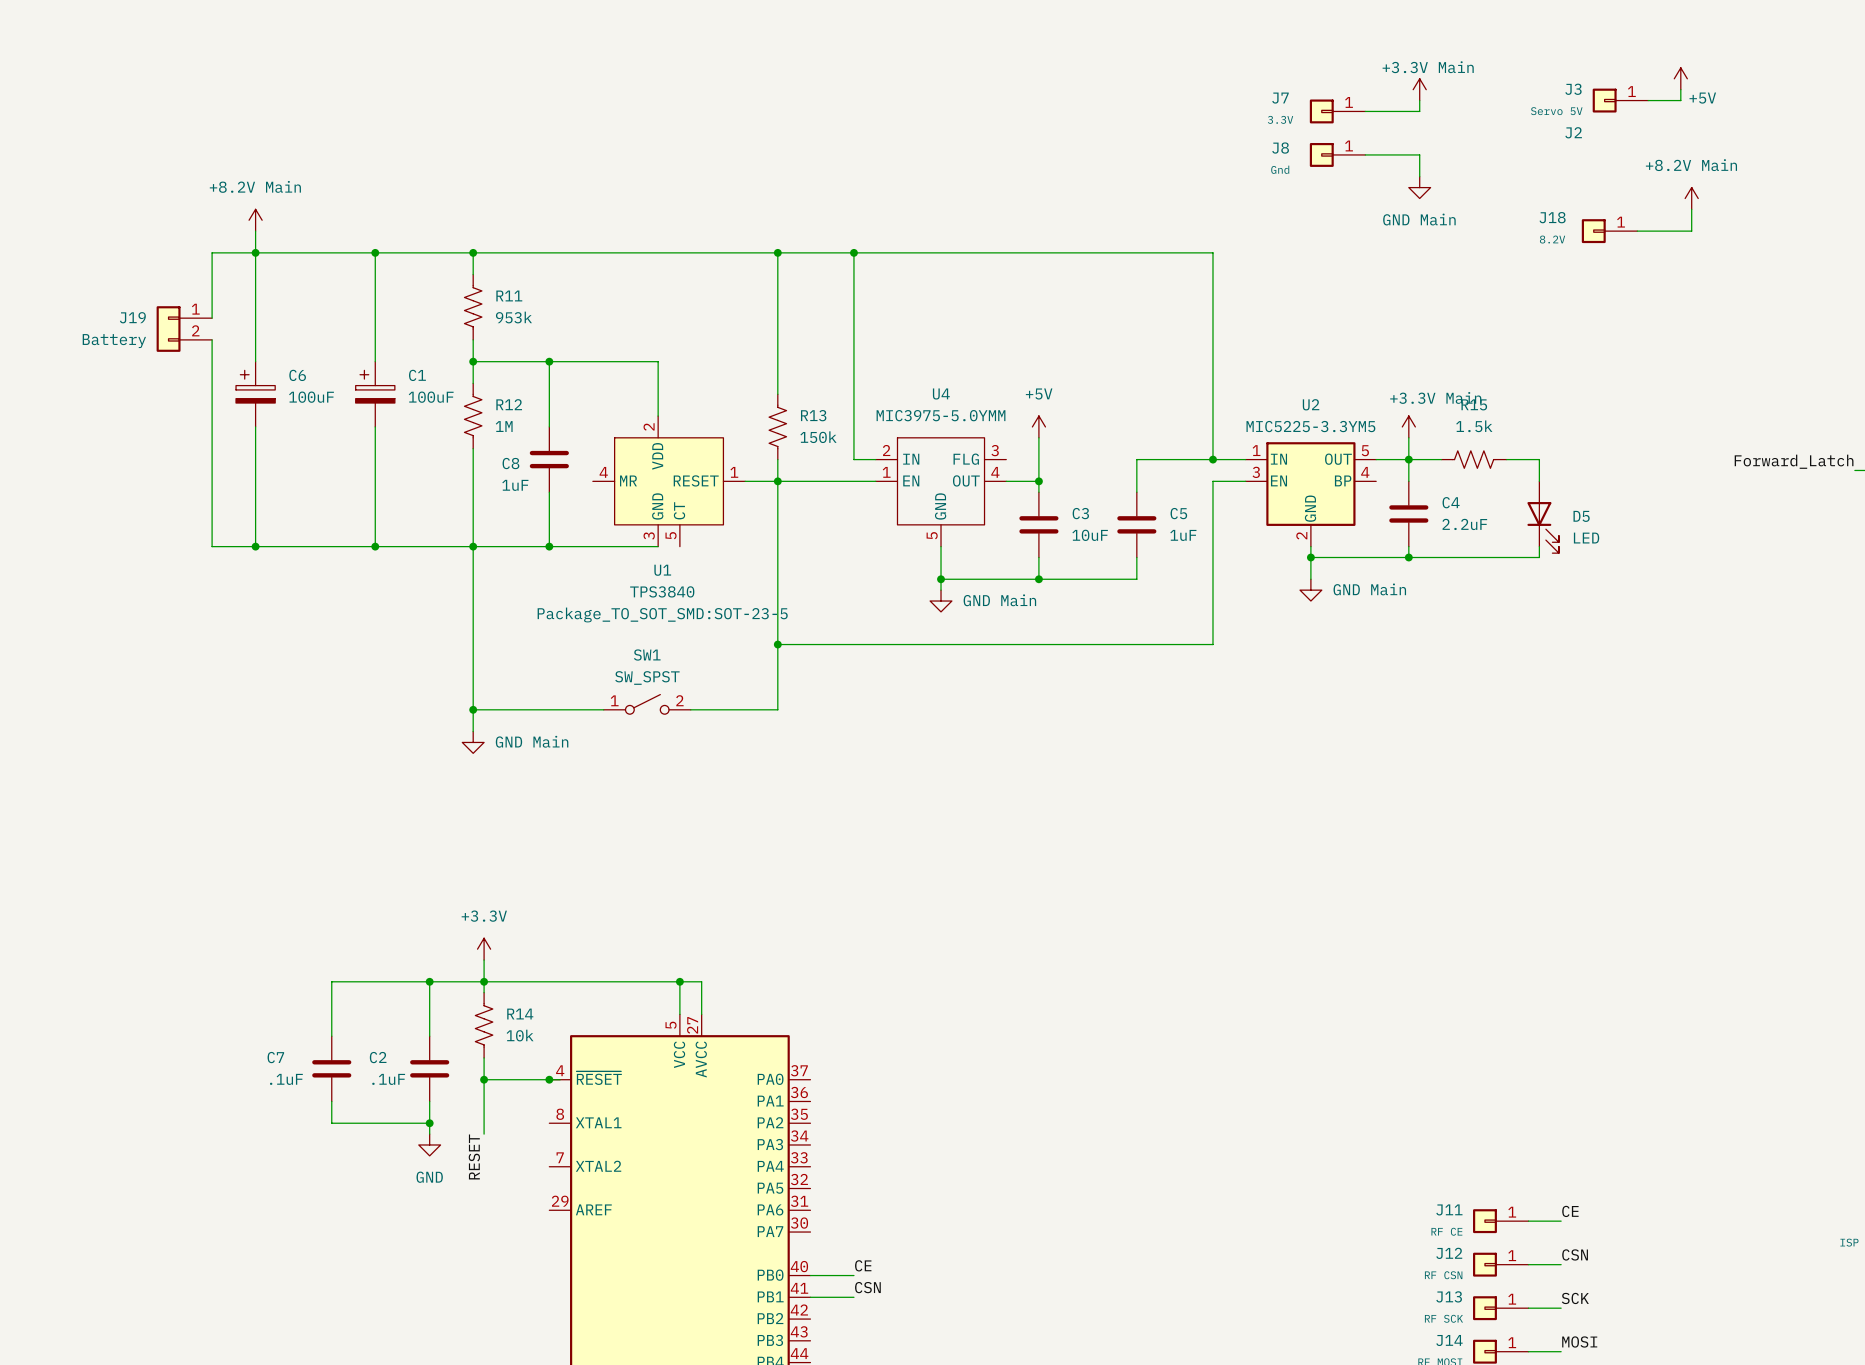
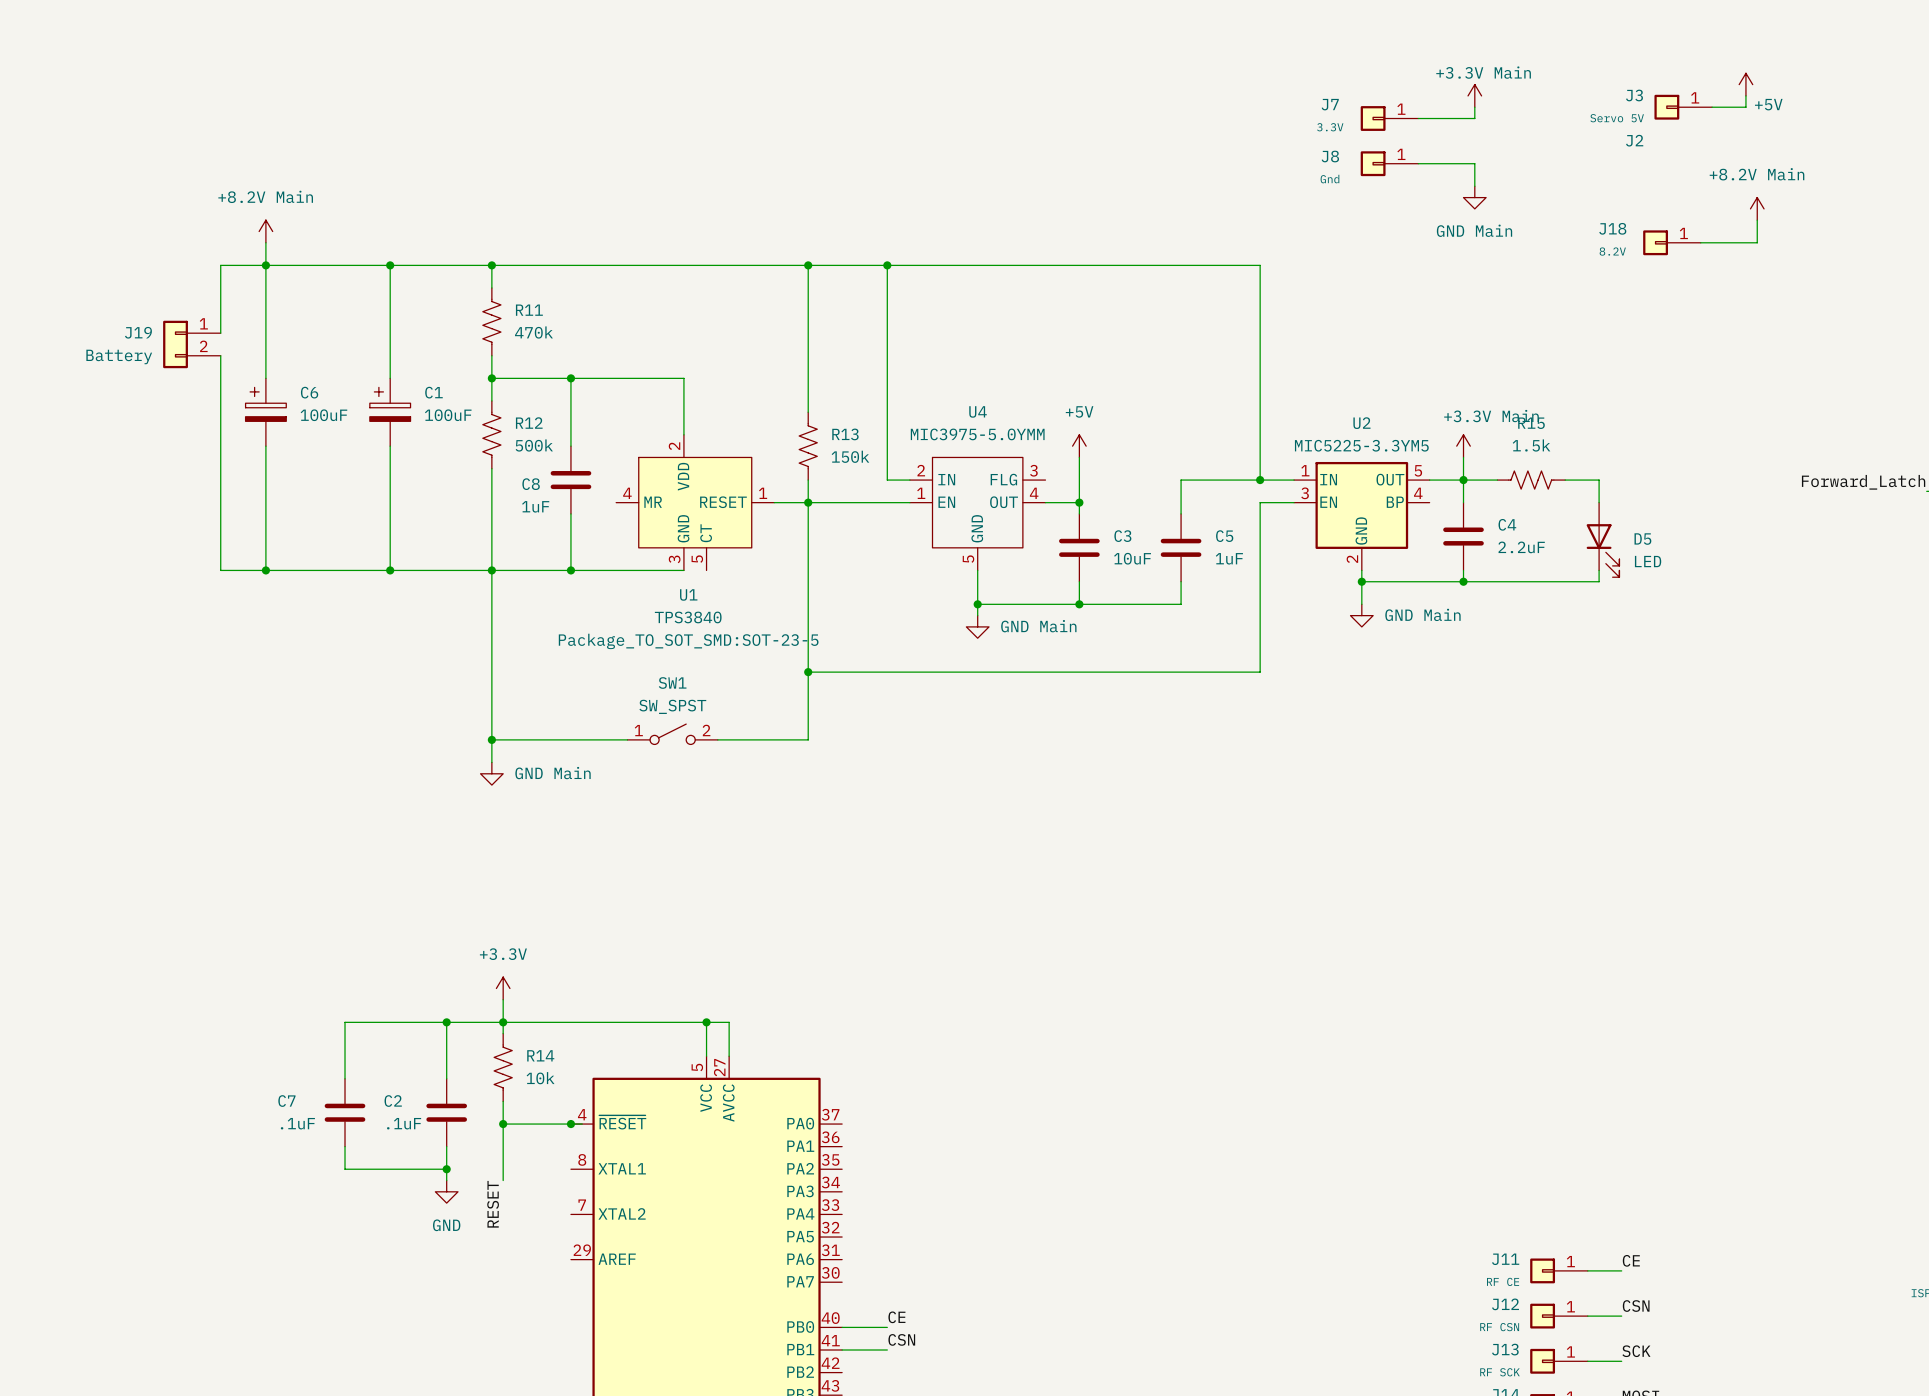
R11 value: 953k (513, 317) -> 470k (533, 332)
R12 value: 1M (504, 426) -> 500k (534, 445)

